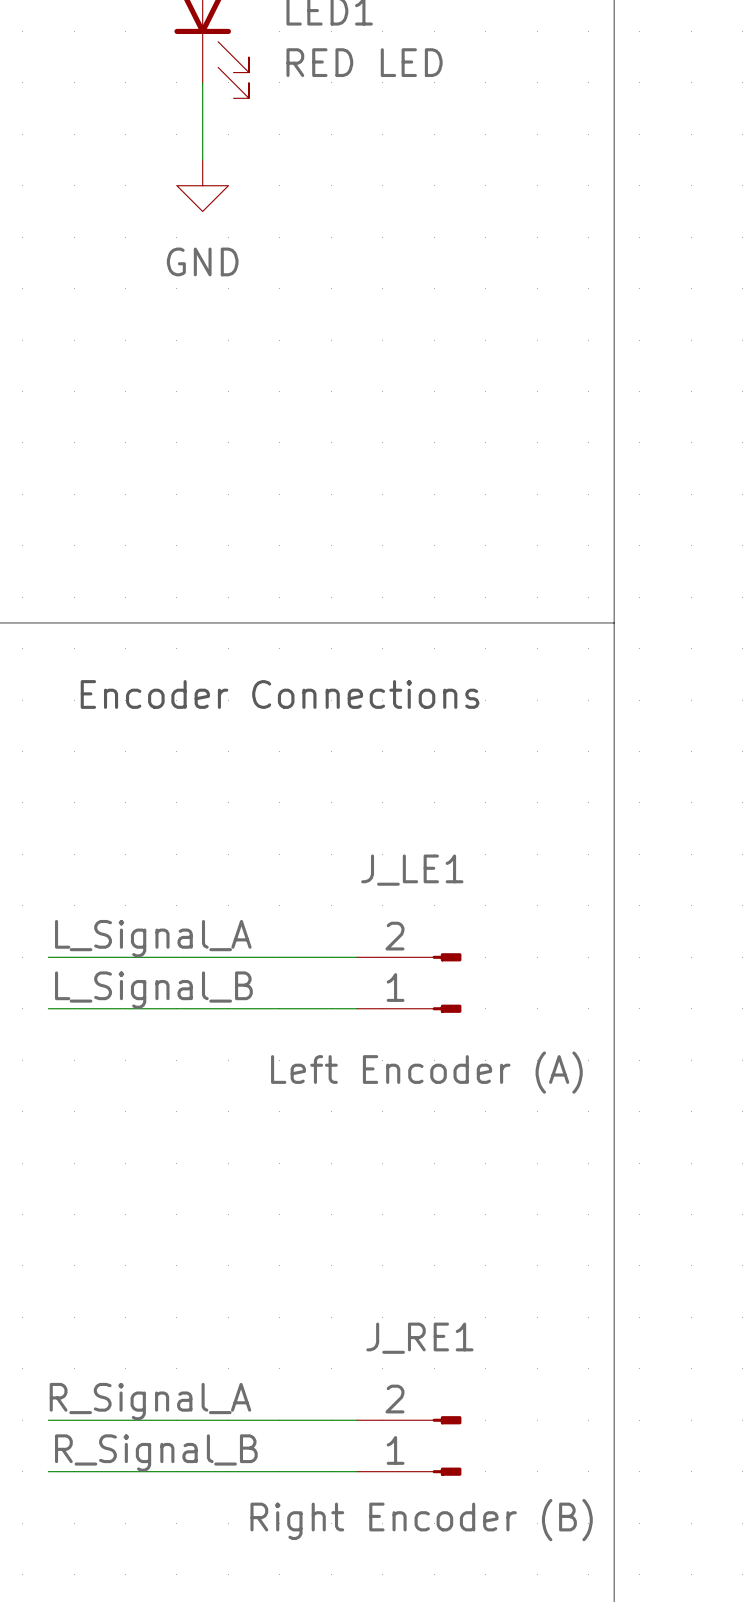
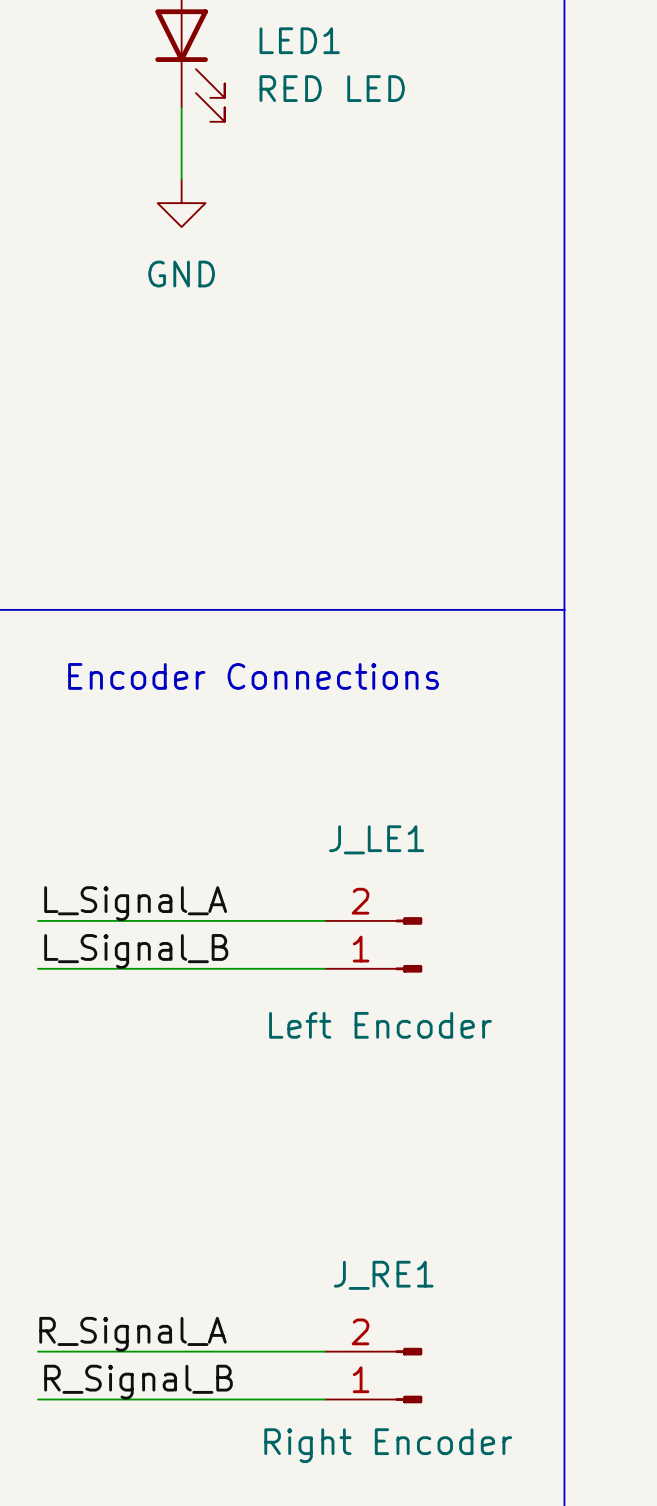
J_LE1 value: Left Encoder (A) (426, 1072) -> Left Encoder (380, 1025)
J_RE1 value: Right Encoder (B) (421, 1520) -> Right Encoder (388, 1445)

